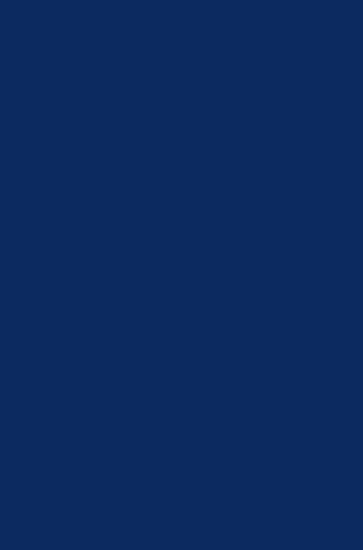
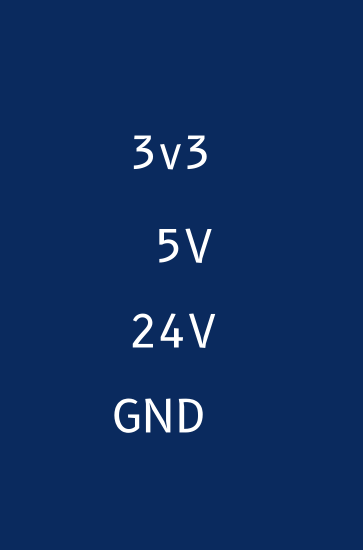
text: none -> 3v3 (170, 152)
text: none -> 5V (185, 245)
text: none -> 24V (174, 330)
text: none -> GND (158, 415)

